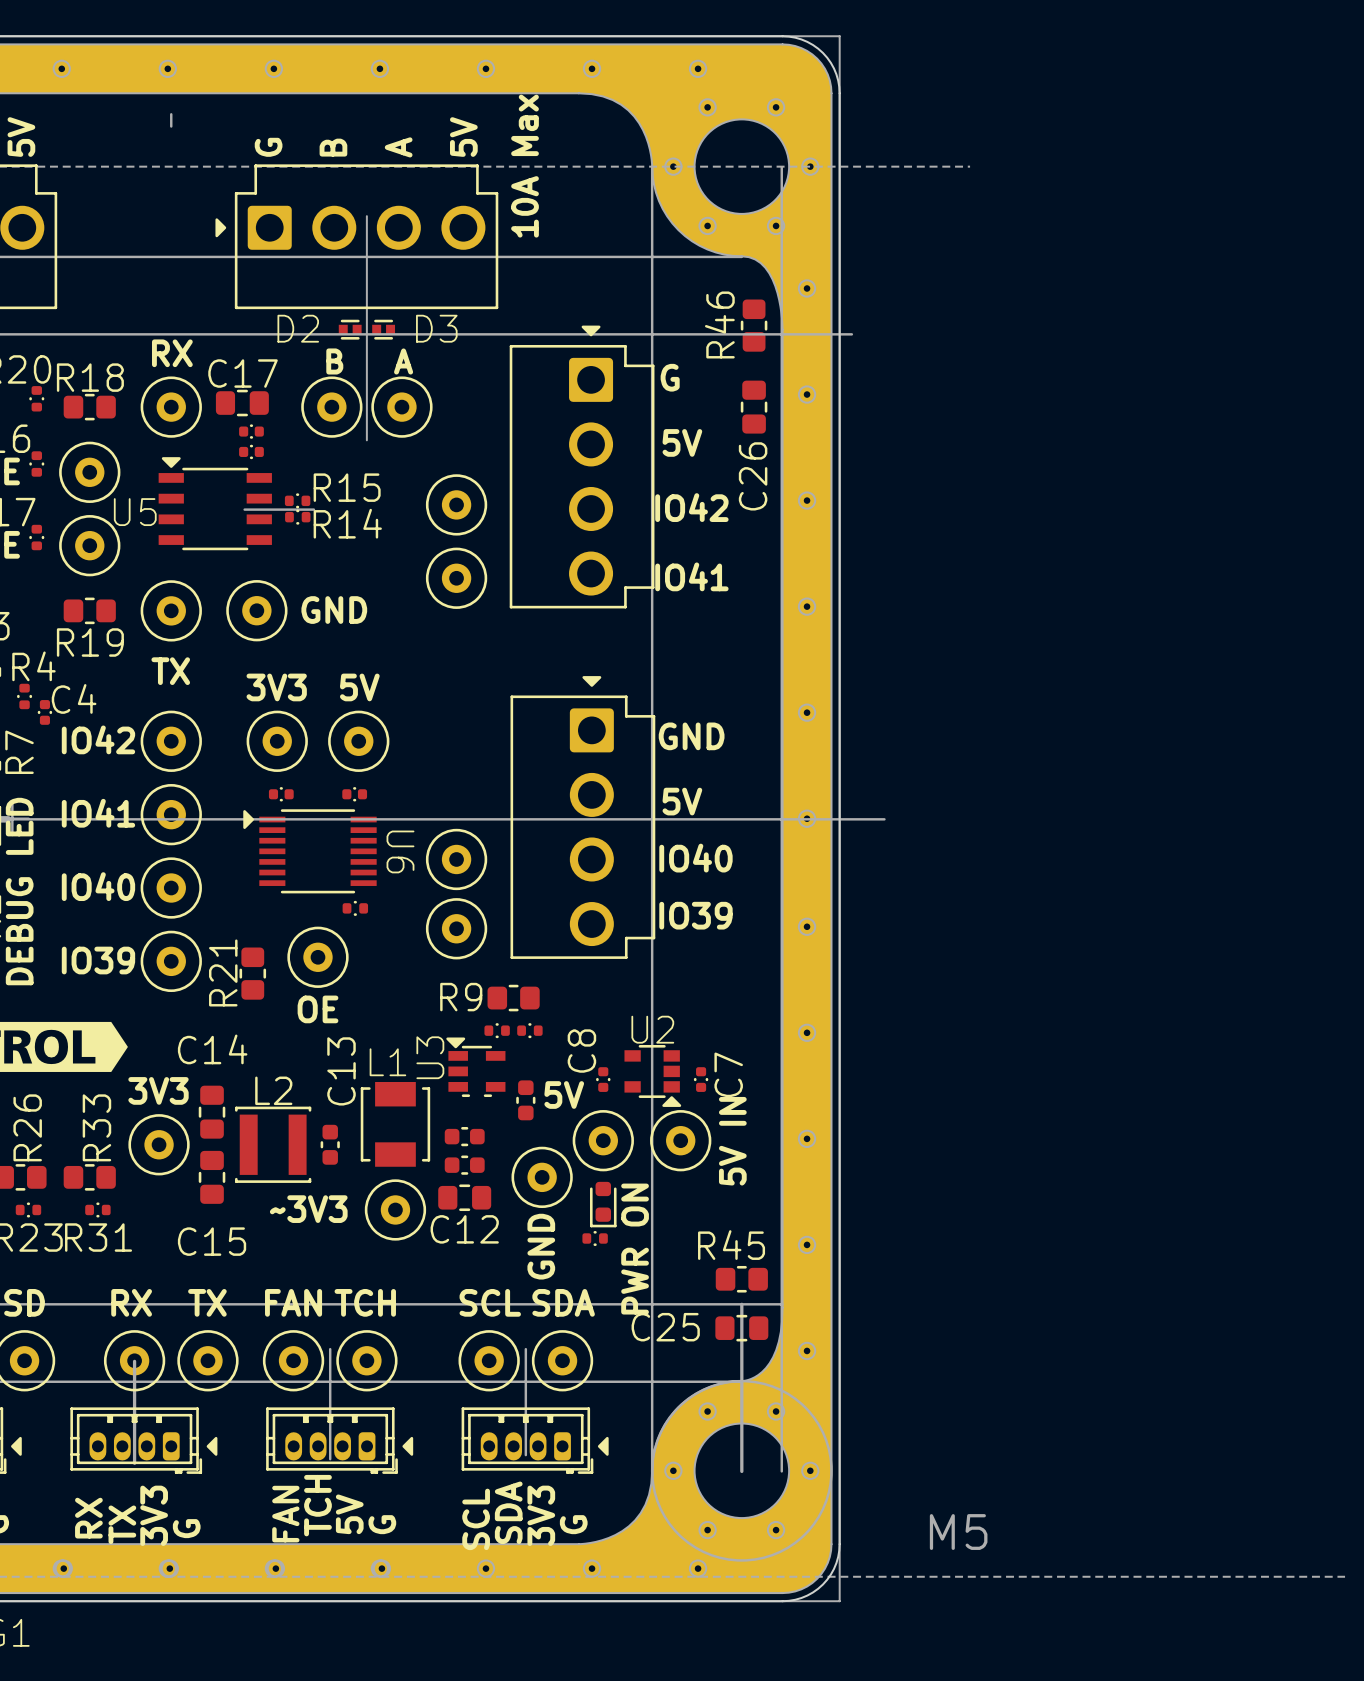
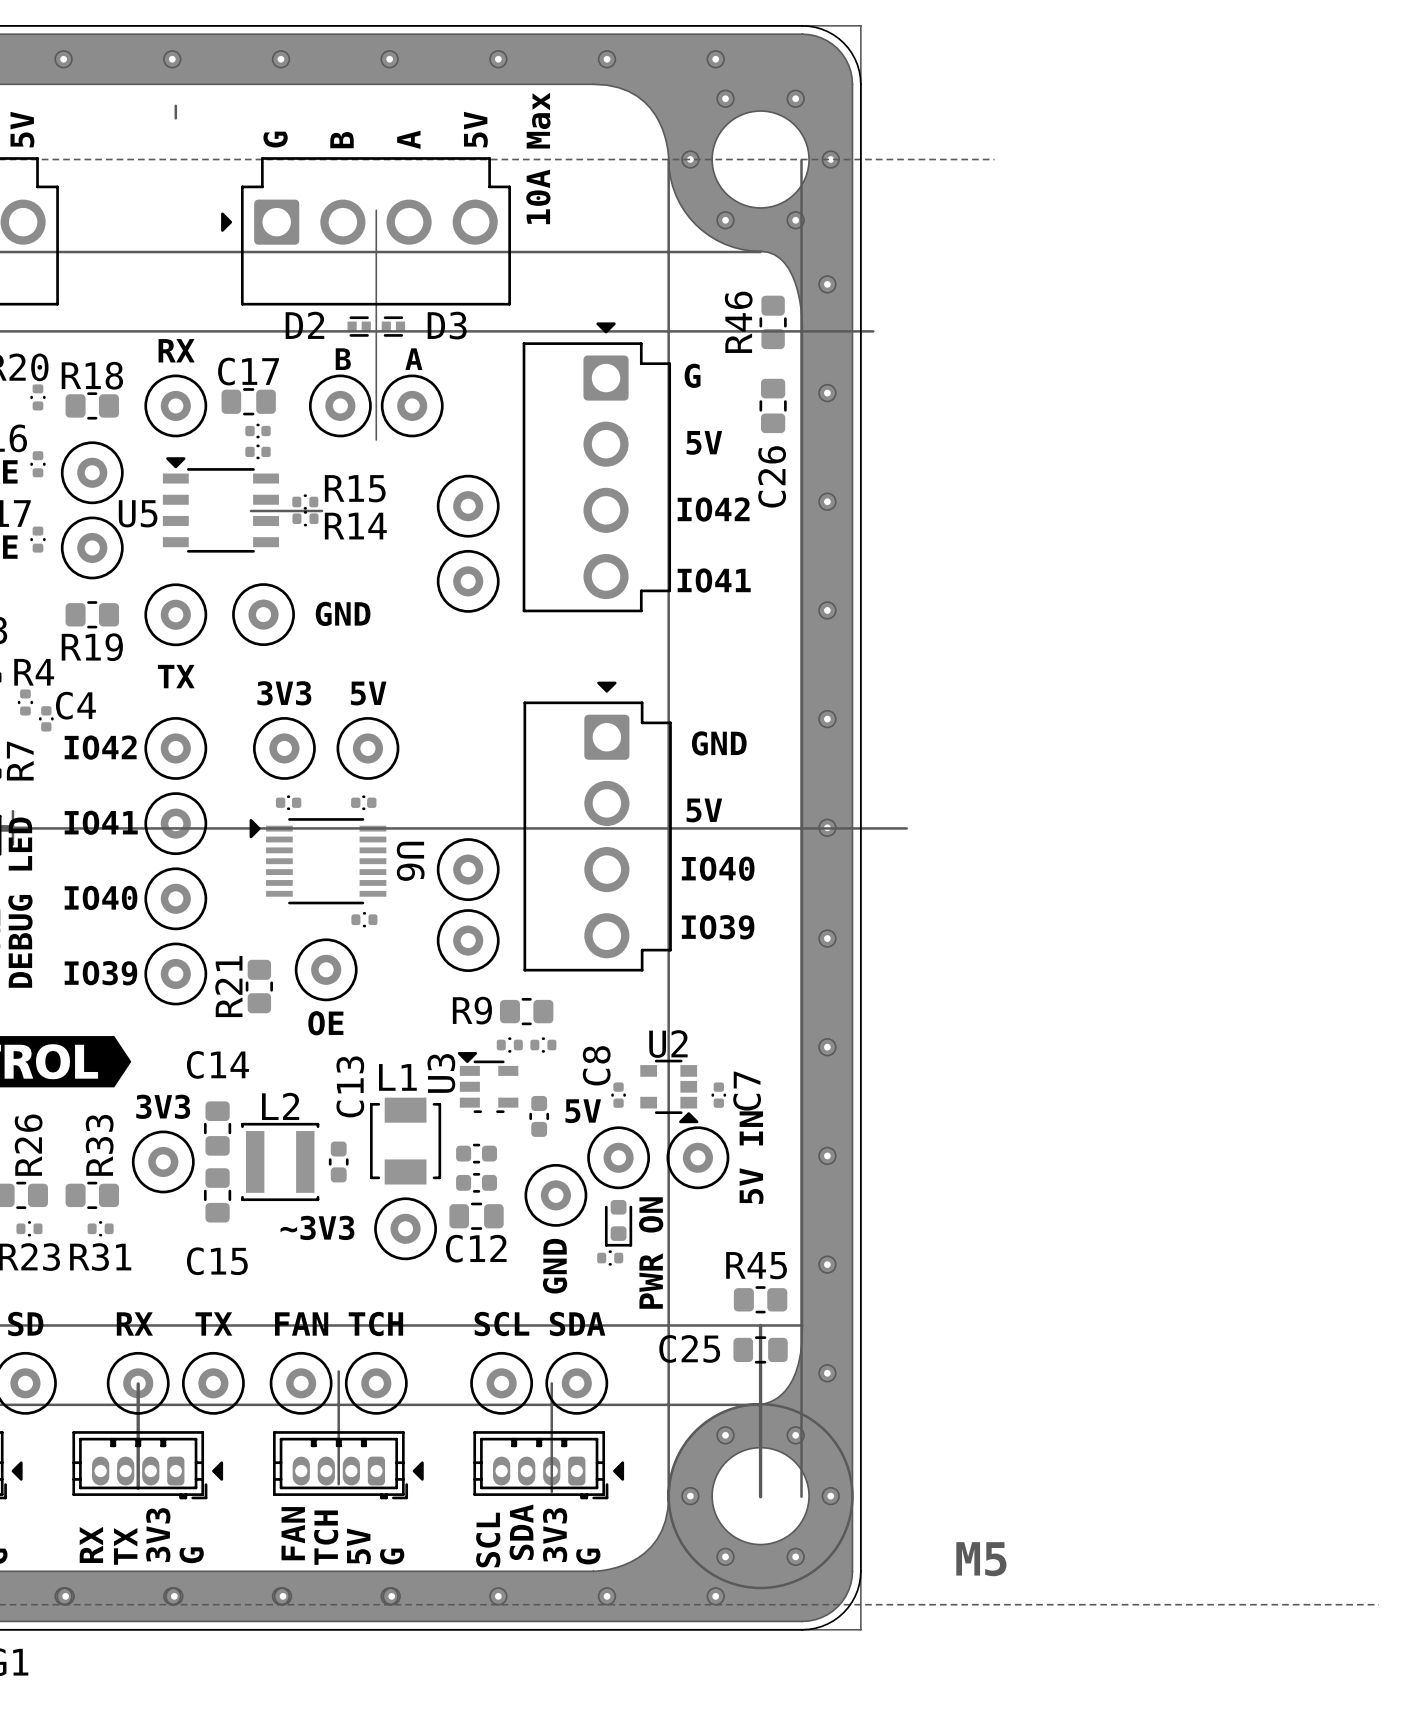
line: (525, 1349) (525, 1455) -> (551, 1383) (551, 1491)

